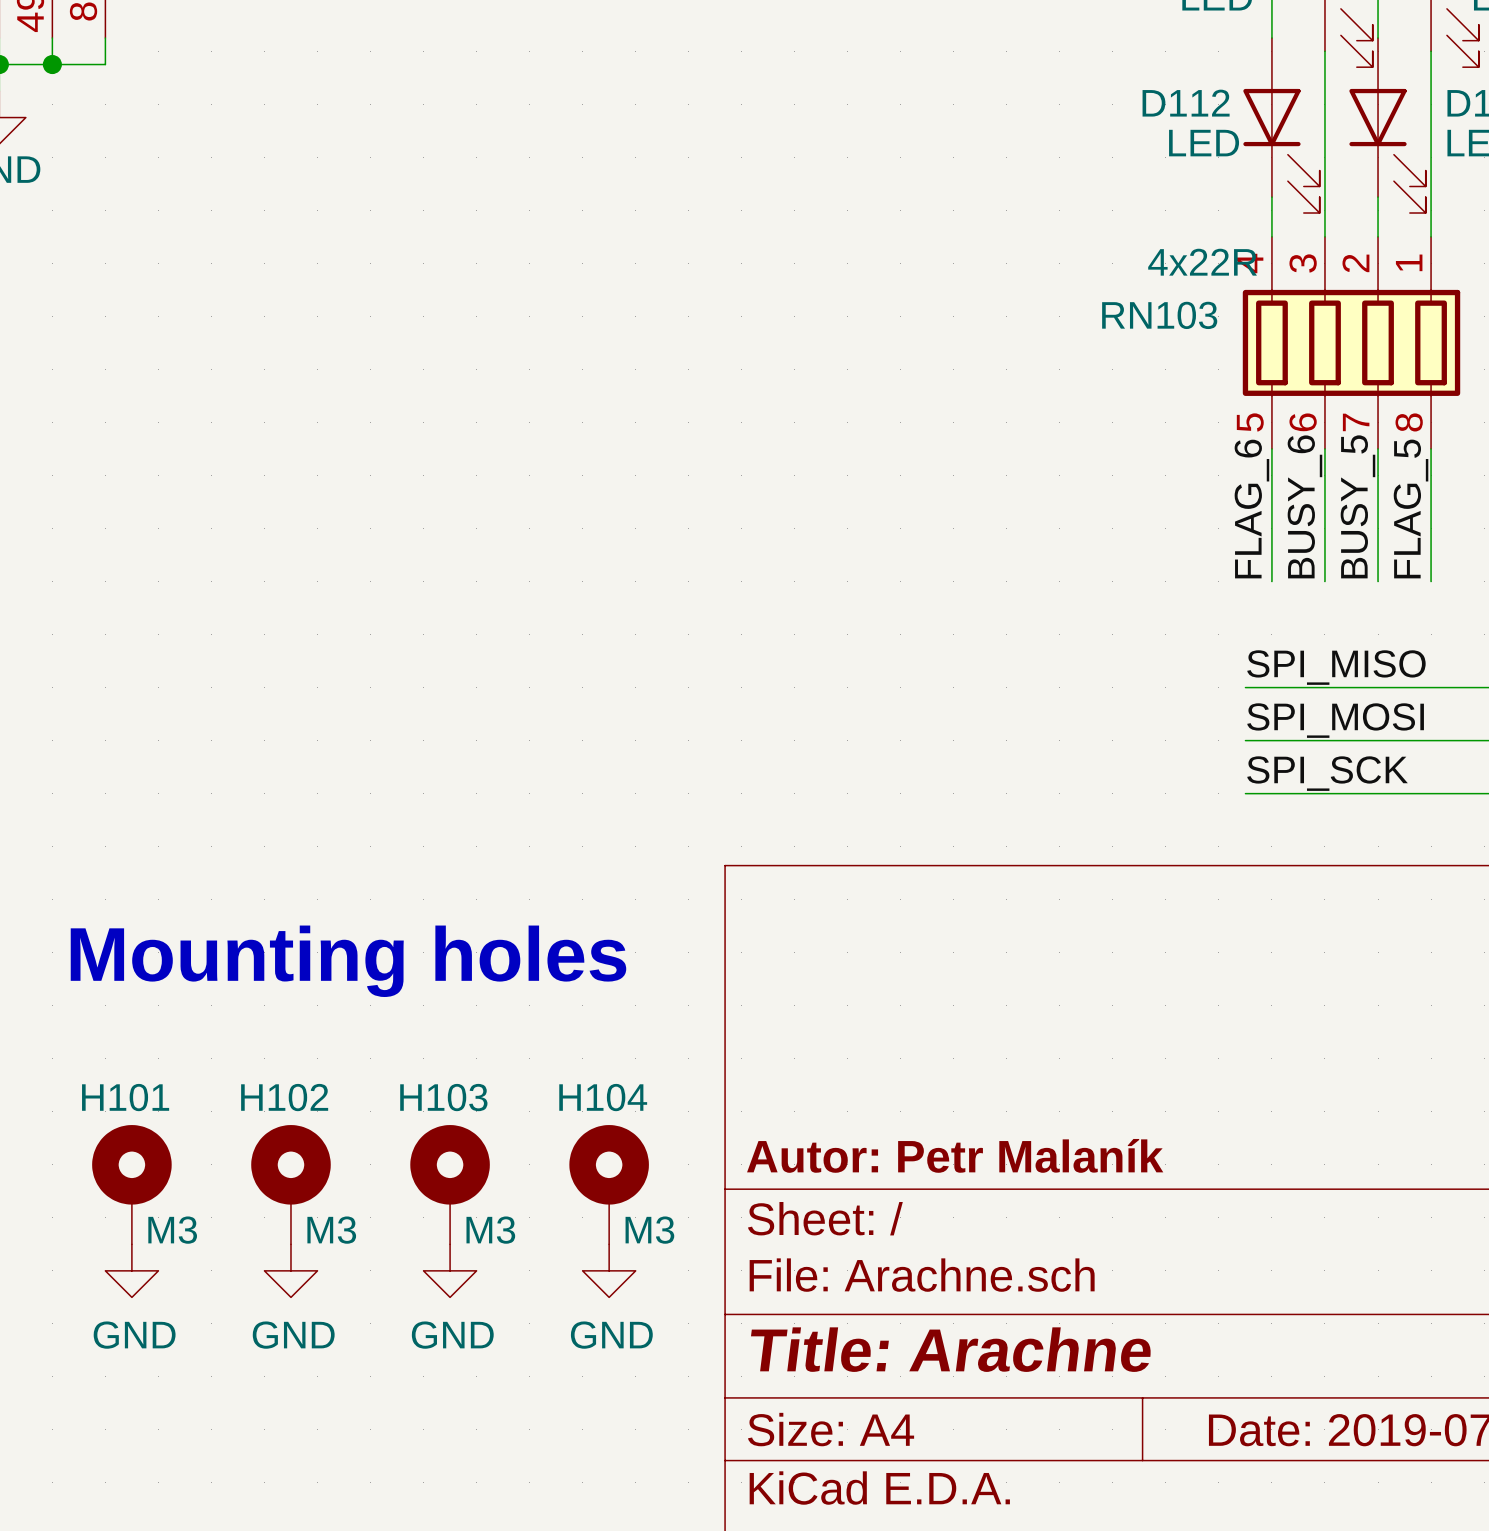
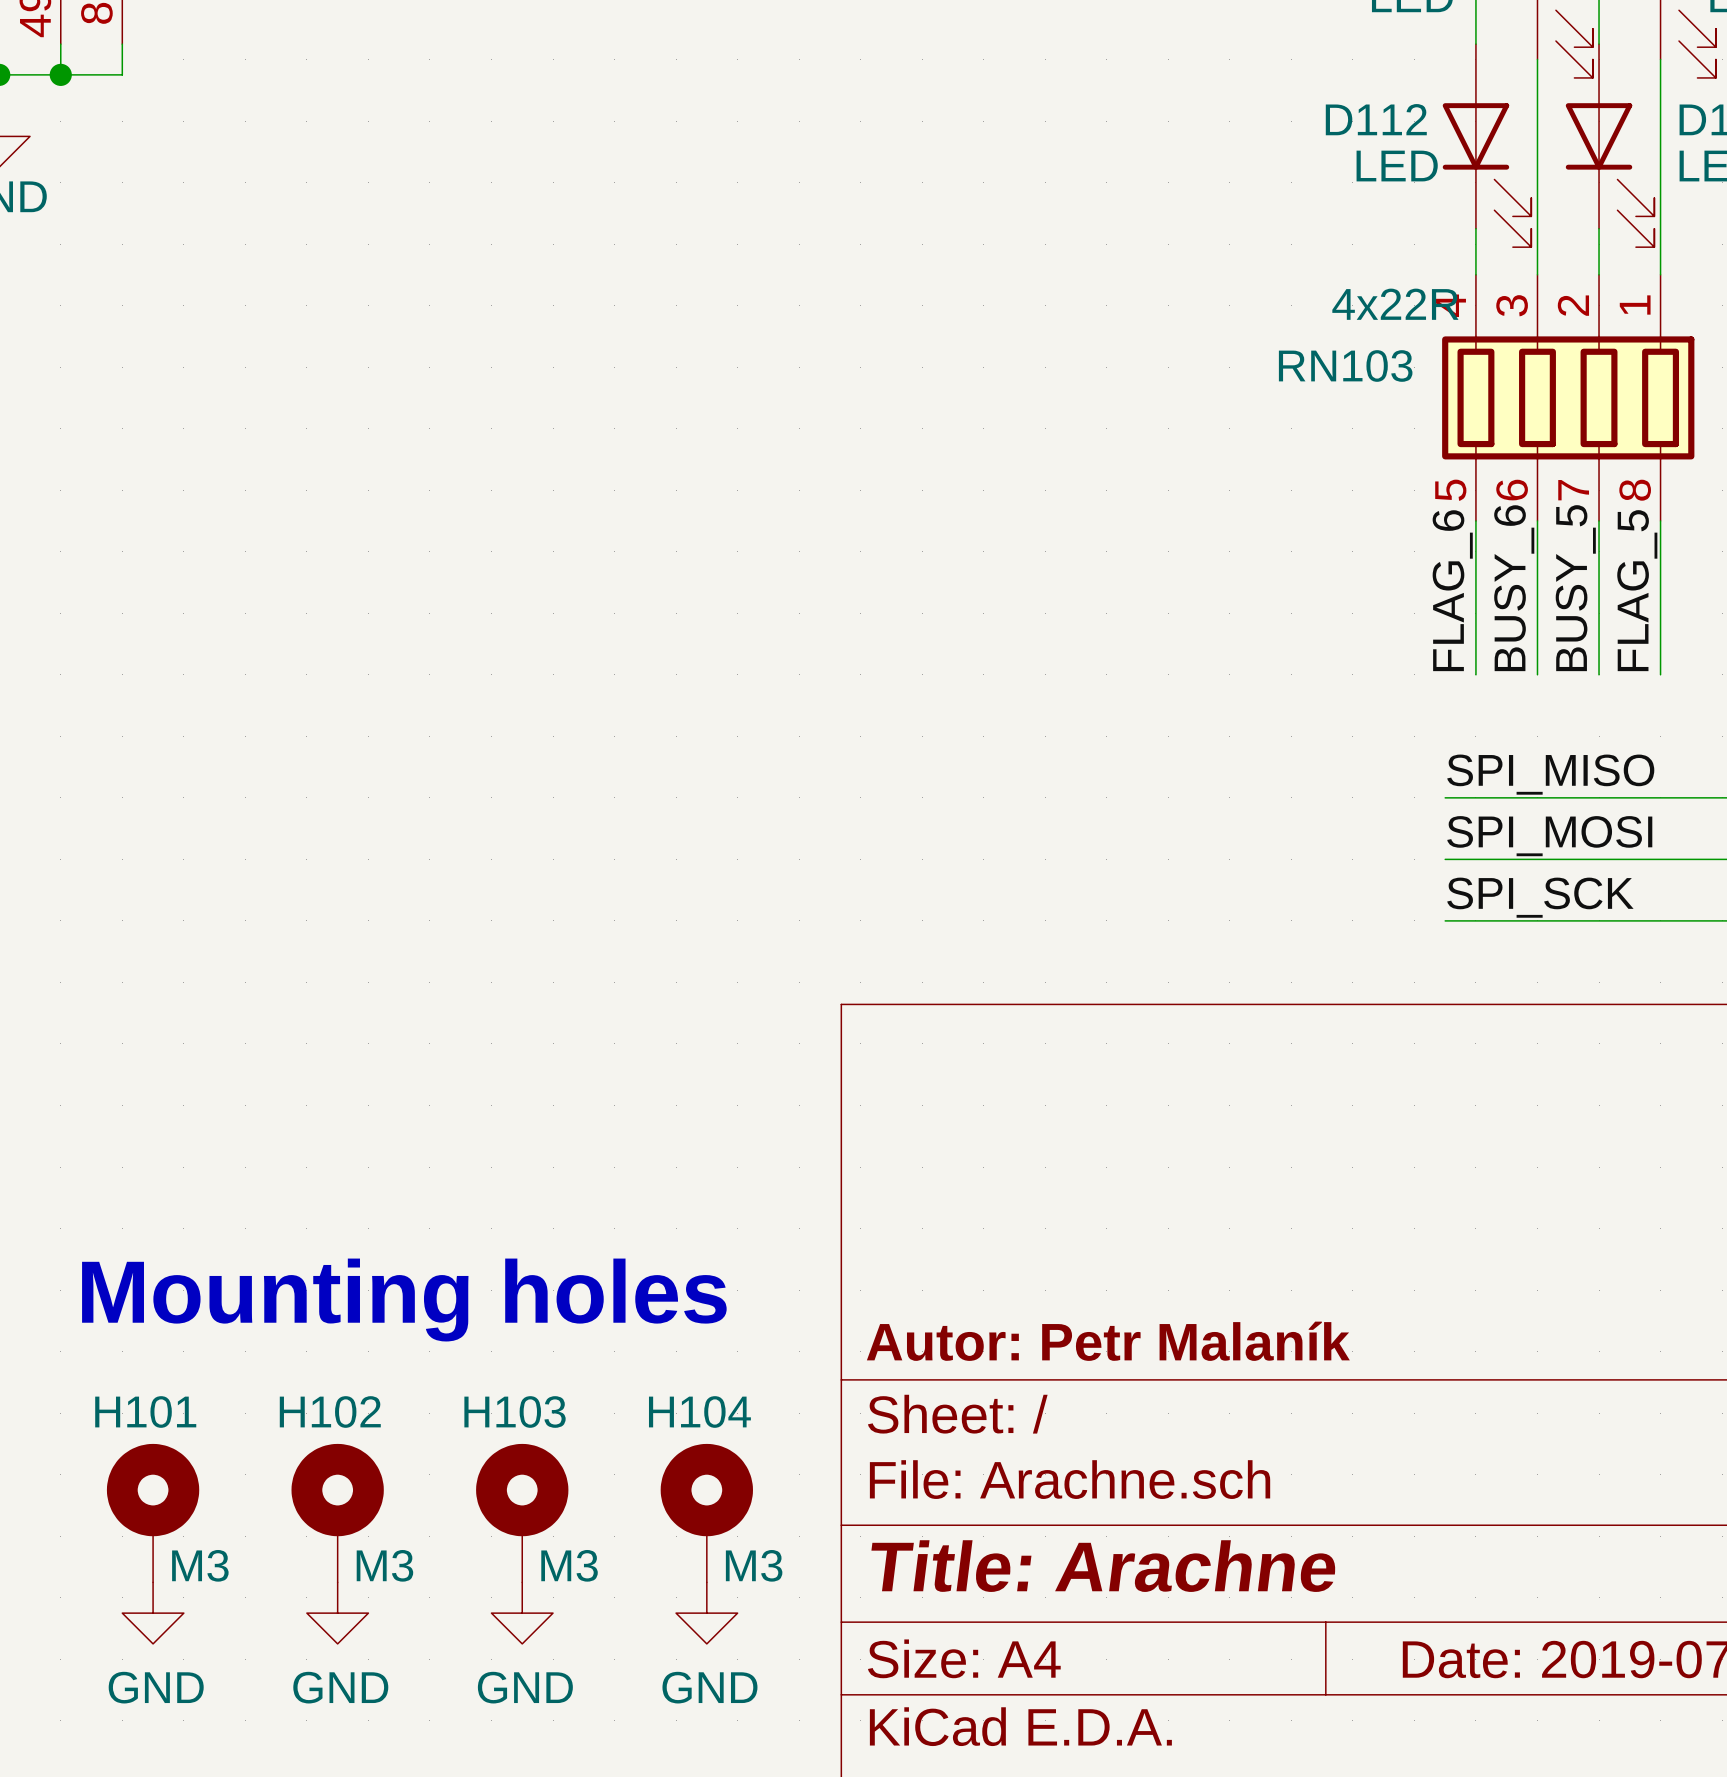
text position: Mounting holes (348, 961) -> Mounting holes (404, 1300)
H101 position: (131, 1184) -> (153, 1513)
H102 position: (290, 1184) -> (337, 1513)
H103 position: (450, 1184) -> (522, 1513)
H104 position: (609, 1184) -> (706, 1513)
power symbol: GND (131, 1270) -> none
power symbol: GND (290, 1270) -> none
power symbol: GND (450, 1270) -> none
power symbol: GND (609, 1270) -> none
power symbol: none -> GND (153, 1613)
power symbol: none -> GND (337, 1613)
power symbol: none -> GND (522, 1613)
power symbol: none -> GND (706, 1613)

